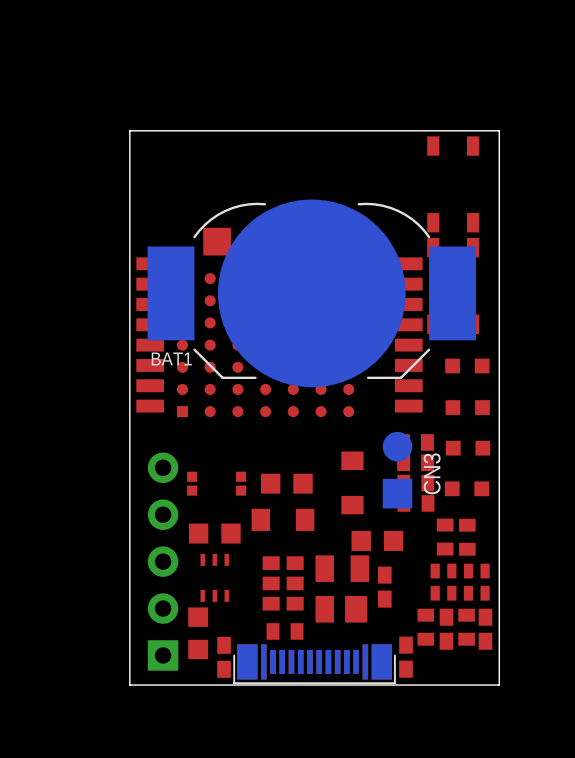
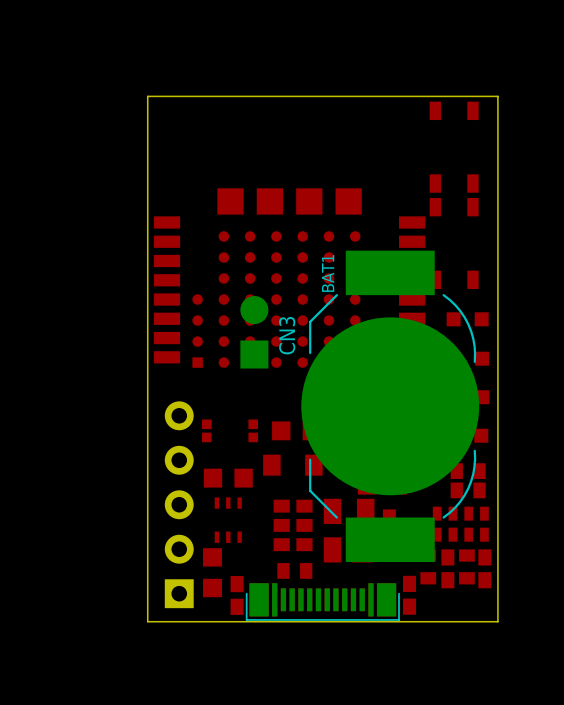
BAT1 rotation: 0° (311, 293) -> 90° clockwise (390, 406)
CN3 position: (397, 470) -> (254, 332)
part: none -> (468, 471)
part: (445, 537) -> none
part: (467, 537) -> none
part: none -> (468, 490)

